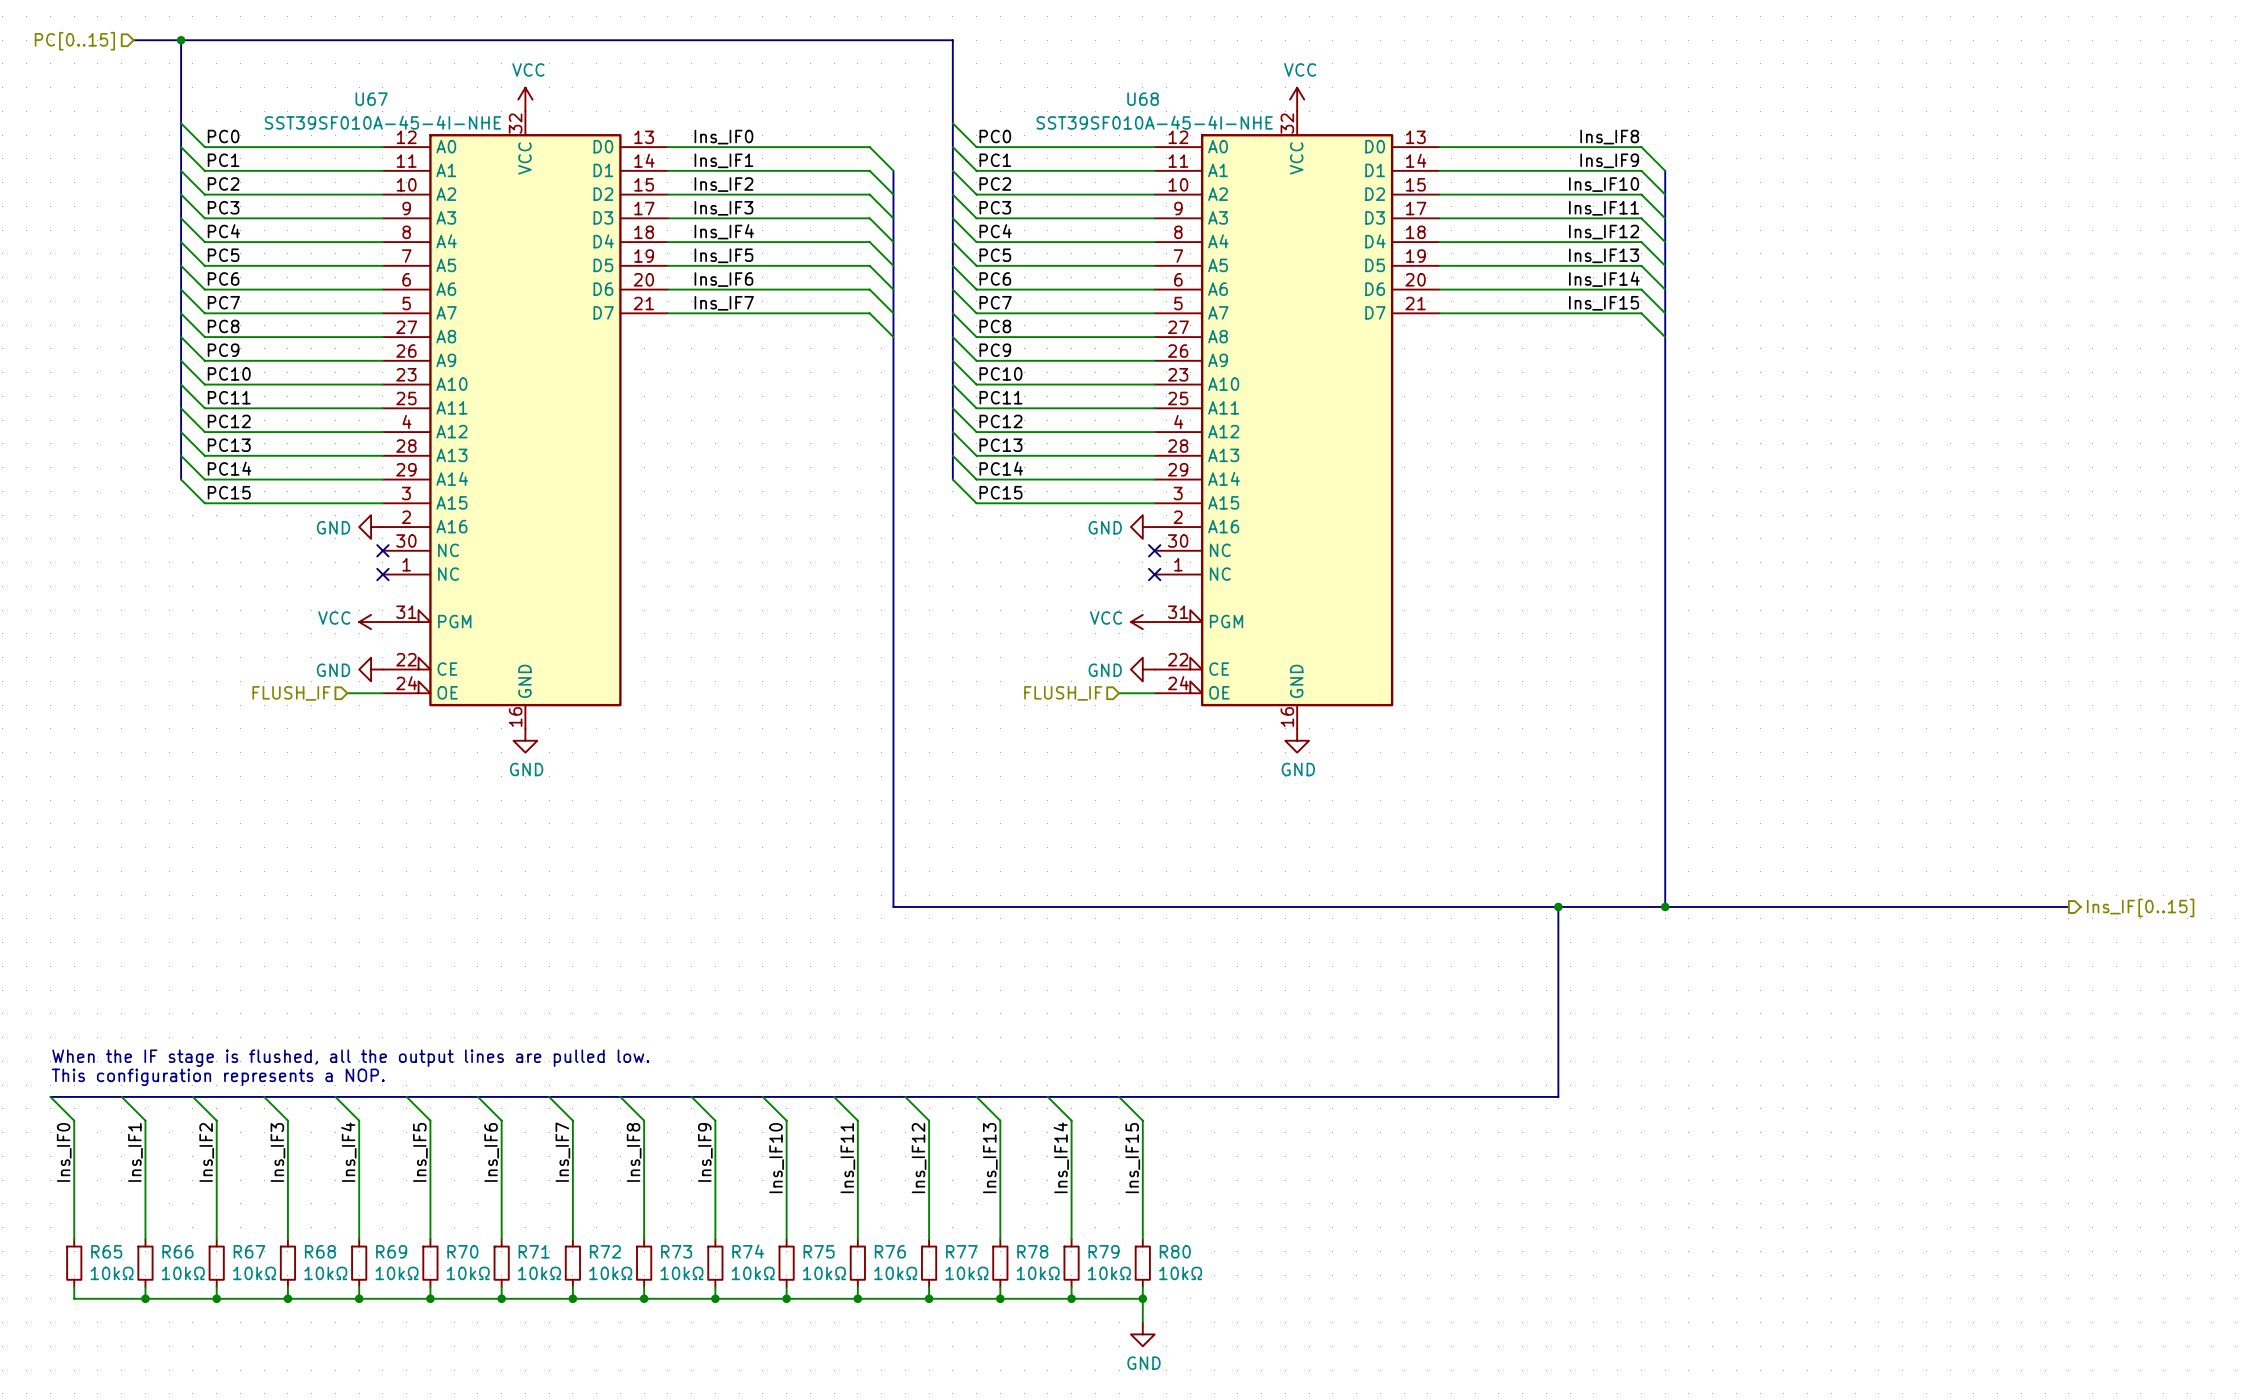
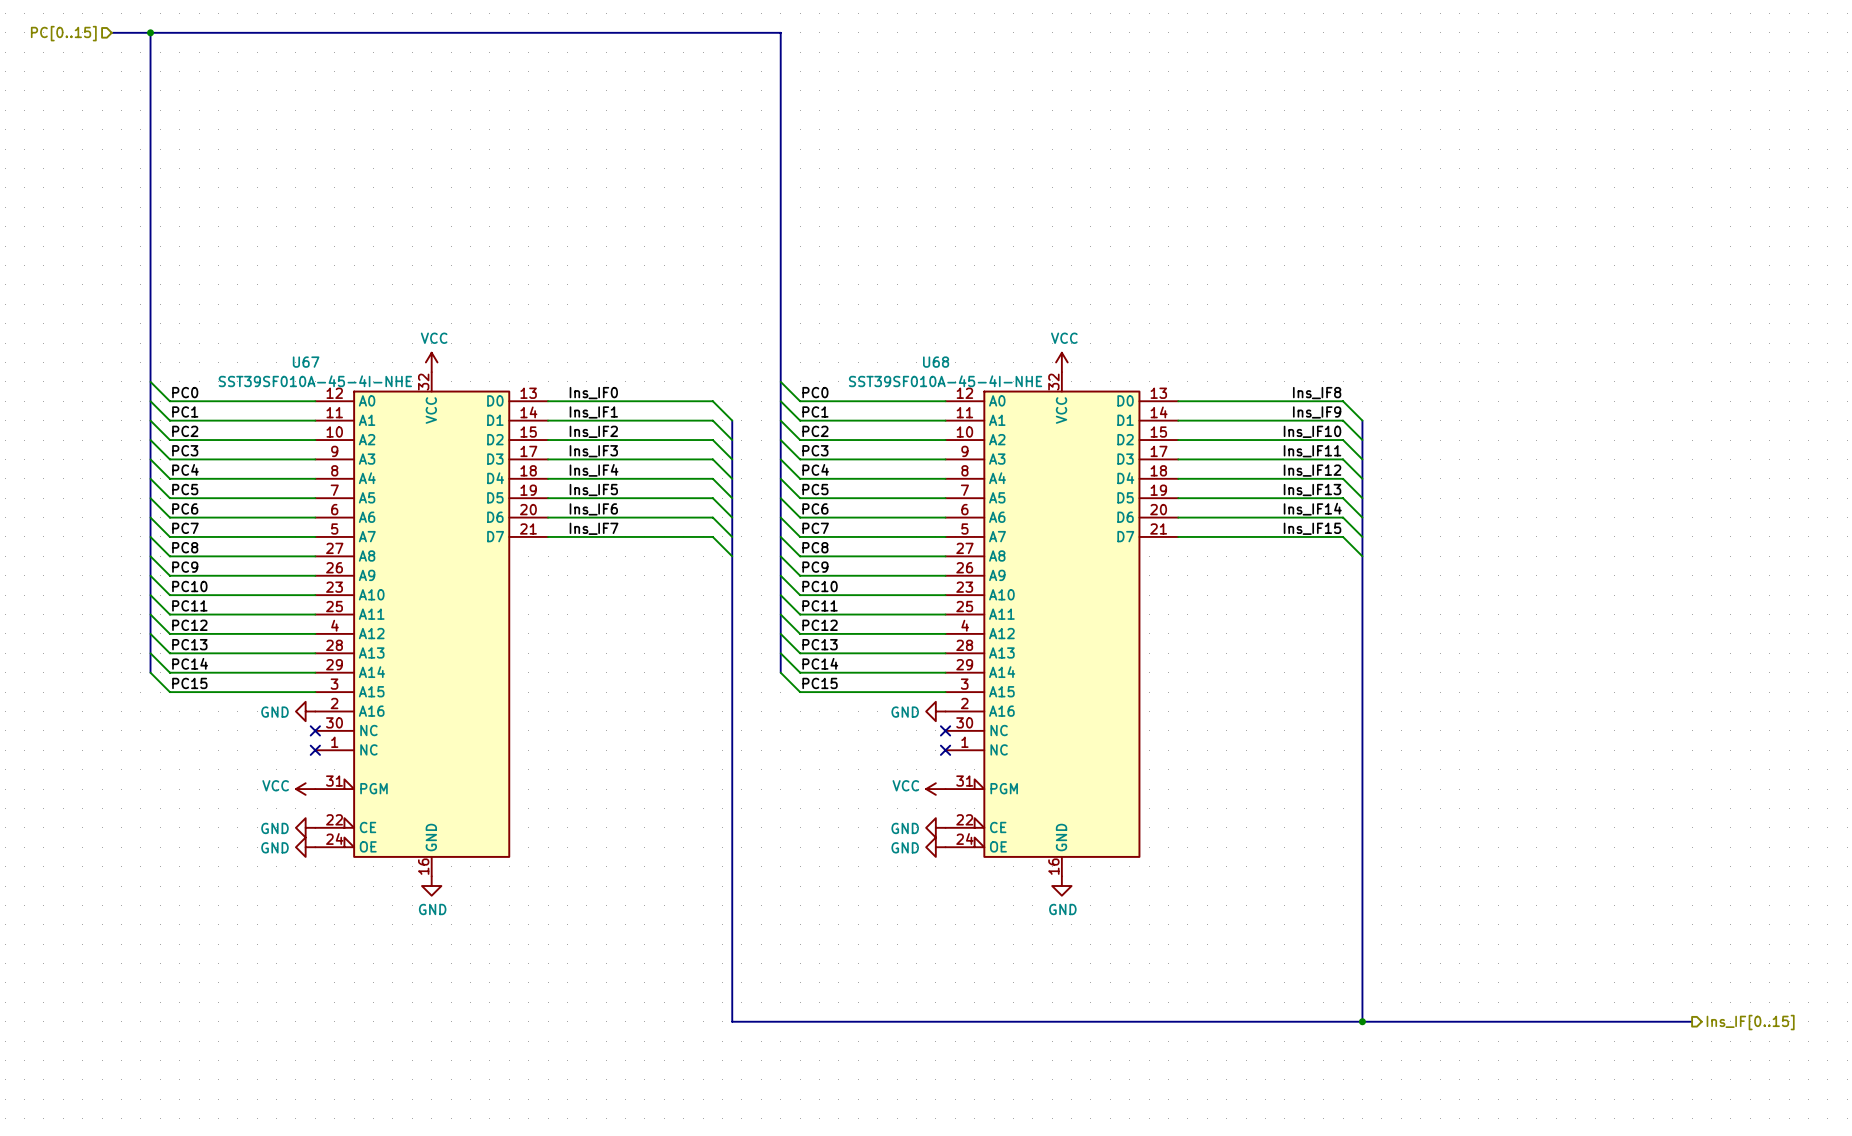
power symbol: VCC (525, 99) -> none
power symbol: VCC (1297, 99) -> none
wire: (181, 123) (204, 147) (382, 147) -> none
wire: (952, 123) (976, 147) (1154, 147) -> none
label: PC0 (223, 136) -> none
label: PC0 (995, 136) -> none
label: Ins_IF0 (723, 137) -> none
label: Ins_IF8 (1609, 137) -> none
wire: (181, 147) (204, 170) (382, 170) -> none
wire: (667, 147) (869, 147) (893, 170) -> none
wire: (952, 147) (976, 170) (1154, 170) -> none
wire: (1439, 147) (1641, 147) (1665, 170) -> none
label: PC1 (223, 160) -> none
label: Ins_IF1 (723, 160) -> none
label: PC1 (995, 160) -> none
label: Ins_IF9 (1609, 160) -> none
wire: (181, 170) (204, 194) (382, 194) -> none
wire: (667, 170) (869, 170) (893, 194) -> none
bus: (893, 170) (893, 515) -> none
wire: (952, 170) (976, 194) (1154, 194) -> none
wire: (1439, 170) (1641, 170) (1665, 194) -> none
bus: (1665, 170) (1665, 515) -> none
label: PC2 (223, 184) -> none
label: Ins_IF2 (723, 184) -> none
label: PC2 (995, 184) -> none
label: Ins_IF10 (1604, 184) -> none
wire: (181, 194) (204, 218) (382, 218) -> none
wire: (667, 194) (869, 194) (893, 218) -> none
wire: (952, 194) (976, 218) (1154, 218) -> none
wire: (1439, 194) (1641, 194) (1665, 218) -> none
label: PC3 (223, 207) -> none
label: PC3 (995, 207) -> none
label: Ins_IF3 (723, 208) -> none
label: Ins_IF11 (1604, 208) -> none
wire: (181, 218) (204, 242) (382, 242) -> none
wire: (667, 218) (869, 218) (893, 242) -> none
wire: (952, 218) (976, 242) (1154, 242) -> none
wire: (1439, 218) (1641, 218) (1665, 242) -> none
label: PC4 (223, 231) -> none
label: Ins_IF4 (724, 231) -> none
label: PC4 (995, 231) -> none
label: Ins_IF12 (1604, 232) -> none
wire: (181, 242) (204, 265) (382, 265) -> (150, 381) (169, 401) (315, 401)
wire: (667, 242) (869, 242) (893, 265) -> none
wire: (952, 242) (976, 265) (1154, 265) -> (780, 381) (800, 401) (945, 401)
wire: (1439, 242) (1641, 242) (1665, 265) -> none
label: PC5 (223, 255) -> none
label: Ins_IF5 (723, 255) -> none
label: PC5 (995, 255) -> none
label: Ins_IF13 (1604, 255) -> none
wire: (181, 265) (204, 289) (382, 289) -> (150, 401) (169, 420) (315, 420)
wire: (667, 265) (869, 265) (893, 289) -> (548, 401) (712, 401) (732, 420)
wire: (952, 265) (976, 289) (1154, 289) -> (780, 401) (800, 420) (945, 420)
wire: (1439, 265) (1641, 265) (1665, 289) -> (1178, 401) (1343, 401) (1362, 420)
label: PC6 (223, 278) -> none
label: PC6 (995, 278) -> none
label: Ins_IF6 (723, 279) -> none
label: Ins_IF14 (1604, 279) -> none
wire: (181, 289) (204, 313) (382, 313) -> (150, 420) (169, 440) (315, 440)
wire: (667, 289) (869, 289) (893, 313) -> (548, 420) (712, 420) (732, 440)
wire: (952, 289) (976, 313) (1154, 313) -> (780, 420) (800, 440) (945, 440)
wire: (1439, 289) (1641, 289) (1665, 313) -> (1178, 420) (1343, 420) (1362, 440)
label: PC7 (223, 302) -> none
label: PC7 (995, 302) -> none
label: Ins_IF7 (724, 303) -> none
label: Ins_IF15 (1604, 303) -> none
wire: (181, 313) (204, 337) (382, 337) -> (150, 440) (169, 459) (315, 459)
wire: (667, 313) (869, 313) (893, 337) -> (548, 440) (712, 440) (732, 459)
wire: (952, 313) (976, 337) (1154, 337) -> (780, 440) (800, 459) (945, 459)
wire: (1439, 313) (1641, 313) (1665, 337) -> (1178, 440) (1343, 440) (1362, 459)
label: PC8 (223, 326) -> none
label: PC8 (995, 326) -> none
wire: (181, 337) (204, 360) (382, 360) -> (150, 459) (169, 478) (315, 478)
wire: (952, 337) (976, 360) (1154, 360) -> (780, 459) (800, 478) (945, 478)
label: PC9 (223, 350) -> none
label: PC9 (995, 350) -> none
wire: (181, 360) (204, 384) (382, 384) -> (150, 478) (169, 498) (315, 498)
wire: (952, 360) (976, 384) (1154, 384) -> (780, 478) (800, 498) (945, 498)
label: PC10 (229, 373) -> none
label: PC10 (1000, 373) -> none
wire: (181, 384) (204, 408) (382, 408) -> (150, 498) (169, 517) (315, 517)
wire: (952, 384) (976, 408) (1154, 408) -> (780, 498) (800, 517) (945, 517)
label: PC11 (229, 397) -> none
label: PC11 (1000, 397) -> none
wire: (181, 408) (204, 432) (382, 432) -> (150, 517) (169, 536) (315, 536)
wire: (952, 408) (976, 432) (1154, 432) -> (780, 517) (800, 536) (945, 536)
U67 position: (525, 420) -> (431, 624)
U68 position: (1297, 420) -> (1061, 624)
label: PC12 (229, 421) -> none
label: PC12 (1000, 421) -> none
wire: (181, 432) (204, 455) (382, 455) -> (150, 536) (169, 556) (315, 556)
wire: (952, 432) (976, 455) (1154, 455) -> (780, 536) (800, 556) (945, 556)
power symbol: none -> VCC (431, 362)
power symbol: none -> VCC (1061, 362)
label: PC13 (229, 445) -> none
label: PC13 (1000, 445) -> none
wire: (181, 455) (204, 479) (382, 479) -> (150, 556) (169, 575) (315, 575)
wire: (952, 455) (976, 479) (1154, 479) -> (780, 556) (800, 575) (945, 575)
label: PC14 (229, 468) -> none
label: PC14 (1001, 468) -> none
wire: (181, 479) (204, 503) (382, 503) -> (150, 575) (169, 595) (315, 595)
bus: none -> (150, 391) (150, 672)
wire: (952, 479) (976, 503) (1154, 503) -> (780, 575) (800, 595) (945, 595)
bus: none -> (780, 391) (780, 672)
label: none -> PC0 (185, 392)
label: none -> PC0 (815, 392)
label: none -> Ins_IF0 (593, 393)
label: none -> Ins_IF8 (1317, 393)
label: PC15 (229, 492) -> PC1 (185, 411)
label: PC15 (1000, 492) -> PC1 (815, 411)
label: none -> Ins_IF1 (593, 412)
label: none -> Ins_IF9 (1317, 412)
power symbol: GND (371, 527) -> none
power symbol: GND (1142, 527) -> none
label: none -> PC2 (185, 431)
label: none -> Ins_IF2 (593, 431)
label: none -> PC2 (815, 431)
label: none -> Ins_IF10 (1312, 431)
no-connect mark: (382, 550) -> none
no-connect mark: (1154, 550) -> none
label: none -> PC3 (185, 450)
label: none -> Ins_IF3 (593, 451)
label: none -> PC3 (815, 450)
label: none -> Ins_IF11 (1312, 451)
wire: none -> (548, 459) (712, 459) (732, 478)
wire: none -> (1178, 459) (1343, 459) (1362, 478)
no-connect mark: (382, 574) -> none
no-connect mark: (1154, 574) -> none
label: none -> PC4 (185, 469)
label: none -> PC4 (815, 469)
label: none -> Ins_IF4 (594, 470)
label: none -> Ins_IF12 (1312, 470)
wire: none -> (548, 478) (712, 478) (732, 498)
wire: none -> (1178, 478) (1343, 478) (1362, 498)
label: none -> PC5 (185, 489)
label: none -> PC5 (815, 489)
label: none -> Ins_IF5 (593, 490)
label: none -> Ins_IF13 (1312, 490)
wire: none -> (548, 498) (712, 498) (732, 517)
wire: none -> (1178, 498) (1343, 498) (1362, 517)
power symbol: VCC (371, 622) -> none
power symbol: VCC (1142, 622) -> none
label: none -> PC6 (185, 508)
label: none -> Ins_IF6 (593, 509)
label: none -> PC6 (815, 508)
label: none -> Ins_IF14 (1312, 509)
wire: none -> (548, 517) (712, 517) (732, 536)
wire: none -> (1178, 517) (1343, 517) (1362, 536)
label: none -> PC7 (185, 528)
label: none -> Ins_IF7 (594, 528)
label: none -> PC7 (815, 528)
label: none -> Ins_IF15 (1312, 528)
wire: none -> (548, 536) (712, 536) (732, 556)
wire: none -> (1178, 536) (1343, 536) (1362, 556)
power symbol: GND (371, 669) -> none
power symbol: GND (1142, 669) -> none
label: none -> PC8 (185, 547)
label: none -> PC8 (815, 547)
hierarchical label: FLUSH_IF (291, 693) -> none
wire: (347, 693) (382, 693) -> none
hierarchical label: FLUSH_IF (1063, 693) -> none
wire: (1119, 693) (1154, 693) -> none
label: none -> PC9 (185, 567)
label: none -> PC9 (815, 567)
label: none -> PC10 (189, 586)
label: none -> PC10 (820, 586)
wire: none -> (150, 595) (169, 614) (315, 614)
wire: none -> (780, 595) (800, 614) (945, 614)
power symbol: GND (525, 740) -> none
power symbol: GND (1297, 740) -> none
label: none -> PC11 (189, 605)
label: none -> PC11 (820, 605)
wire: none -> (150, 614) (169, 633) (315, 633)
wire: none -> (780, 614) (800, 633) (945, 633)
label: none -> PC12 (189, 625)
label: none -> PC12 (820, 625)
wire: none -> (150, 633) (169, 653) (315, 653)
wire: none -> (780, 633) (800, 653) (945, 653)
label: none -> PC13 (189, 644)
label: none -> PC13 (820, 644)
wire: none -> (150, 653) (169, 672) (315, 672)
wire: none -> (780, 653) (800, 672) (945, 672)
label: none -> PC14 (190, 663)
label: none -> PC14 (820, 663)
wire: none -> (150, 672) (169, 692) (315, 692)
wire: none -> (780, 672) (800, 692) (945, 692)
label: none -> PC15 (189, 683)
label: none -> PC15 (820, 683)
power symbol: none -> GND (305, 711)
power symbol: none -> GND (935, 711)
no-connect mark: none -> (315, 730)
no-connect mark: none -> (945, 730)
bus: (893, 906) (2068, 906) -> (732, 740) (732, 1021) (1692, 1021)
bus: (1558, 906) (1558, 1096) (50, 1096) -> none
junction: (1558, 906) -> none
bus: none -> (1362, 740) (1362, 1021)
junction: (1665, 906) -> none
hierarchical label: Ins_IF[0..15] (2140, 907) -> none
no-connect mark: none -> (315, 750)
no-connect mark: none -> (945, 750)
power symbol: none -> VCC (305, 789)
power symbol: none -> VCC (935, 789)
power symbol: none -> GND (305, 827)
power symbol: none -> GND (935, 827)
power symbol: none -> GND (305, 847)
power symbol: none -> GND (935, 847)
text: When the IF stage is flushed, all the output lines are pulled low. (350, 1058) -> none
text: This configuration represents a NOP. (218, 1077) -> none
power symbol: none -> GND (431, 886)
power symbol: none -> GND (1061, 886)
wire: (50, 1096) (74, 1120) (74, 1239) -> none
wire: (121, 1096) (145, 1120) (145, 1239) -> none
wire: (192, 1096) (216, 1120) (216, 1239) -> none
wire: (264, 1096) (287, 1120) (287, 1239) -> none
wire: (335, 1096) (359, 1120) (359, 1239) -> none
wire: (406, 1096) (430, 1120) (430, 1239) -> none
wire: (477, 1096) (501, 1120) (501, 1239) -> none
wire: (549, 1096) (572, 1120) (572, 1239) -> none
wire: (620, 1096) (644, 1120) (644, 1239) -> none
wire: (691, 1096) (715, 1120) (715, 1239) -> none
wire: (762, 1096) (786, 1120) (786, 1239) -> none
wire: (834, 1096) (857, 1120) (857, 1239) -> none
wire: (905, 1096) (929, 1120) (929, 1239) -> none
wire: (976, 1096) (1000, 1120) (1000, 1239) -> none
wire: (1047, 1096) (1071, 1120) (1071, 1239) -> none
wire: (1119, 1096) (1142, 1120) (1142, 1239) -> none
label: Ins_IF0 (64, 1152) -> none
label: Ins_IF1 (135, 1152) -> none
label: Ins_IF2 (206, 1152) -> none
label: Ins_IF3 (277, 1152) -> none
label: Ins_IF4 (348, 1152) -> none
label: Ins_IF5 (420, 1152) -> none
label: Ins_IF6 (491, 1152) -> none
label: Ins_IF7 (562, 1152) -> none
label: Ins_IF8 (634, 1152) -> none
label: Ins_IF9 (705, 1152) -> none
label: Ins_IF14 (1061, 1157) -> none
label: Ins_IF10 (776, 1158) -> none
label: Ins_IF11 (847, 1158) -> none
label: Ins_IF12 (919, 1158) -> none
label: Ins_IF13 (990, 1158) -> none
label: Ins_IF15 (1132, 1158) -> none
junction: none -> (1362, 1021)
hierarchical label: none -> Ins_IF[0..15] (1750, 1022)
R65: 10kΩ (74, 1263) -> none
R66: 10kΩ (145, 1263) -> none
R67: 10kΩ (216, 1263) -> none
R68: 10kΩ (287, 1263) -> none
R69: 10kΩ (359, 1263) -> none
R70: 10kΩ (430, 1263) -> none
R71: 10kΩ (501, 1263) -> none
R72: 10kΩ (572, 1263) -> none
R73: 10kΩ (644, 1263) -> none
R74: 10kΩ (715, 1263) -> none
R75: 10kΩ (786, 1263) -> none
R76: 10kΩ (857, 1263) -> none
R77: 10kΩ (929, 1263) -> none
R78: 10kΩ (1000, 1263) -> none
R79: 10kΩ (1071, 1263) -> none
R80: 10kΩ (1142, 1263) -> none
wire: (74, 1286) (74, 1298) (1142, 1298) -> none
wire: (145, 1286) (145, 1298) -> none
wire: (216, 1286) (216, 1298) -> none
wire: (287, 1286) (287, 1298) -> none
wire: (359, 1286) (359, 1298) -> none
wire: (430, 1286) (430, 1298) -> none
wire: (501, 1286) (501, 1298) -> none
wire: (572, 1286) (572, 1298) -> none
wire: (644, 1286) (644, 1298) -> none
wire: (715, 1286) (715, 1298) -> none
wire: (786, 1286) (786, 1298) -> none
wire: (857, 1286) (857, 1298) -> none
wire: (929, 1286) (929, 1298) -> none
wire: (1000, 1286) (1000, 1298) -> none
wire: (1071, 1286) (1071, 1298) -> none
wire: (1142, 1286) (1142, 1322) -> none
junction: (145, 1298) -> none
junction: (216, 1298) -> none
junction: (287, 1298) -> none
junction: (359, 1298) -> none
junction: (430, 1298) -> none
junction: (501, 1298) -> none
junction: (572, 1298) -> none
junction: (644, 1298) -> none
junction: (715, 1298) -> none
junction: (786, 1298) -> none
junction: (857, 1298) -> none
junction: (929, 1298) -> none
junction: (1000, 1298) -> none
junction: (1071, 1298) -> none
junction: (1142, 1298) -> none
power symbol: GND (1142, 1334) -> none

